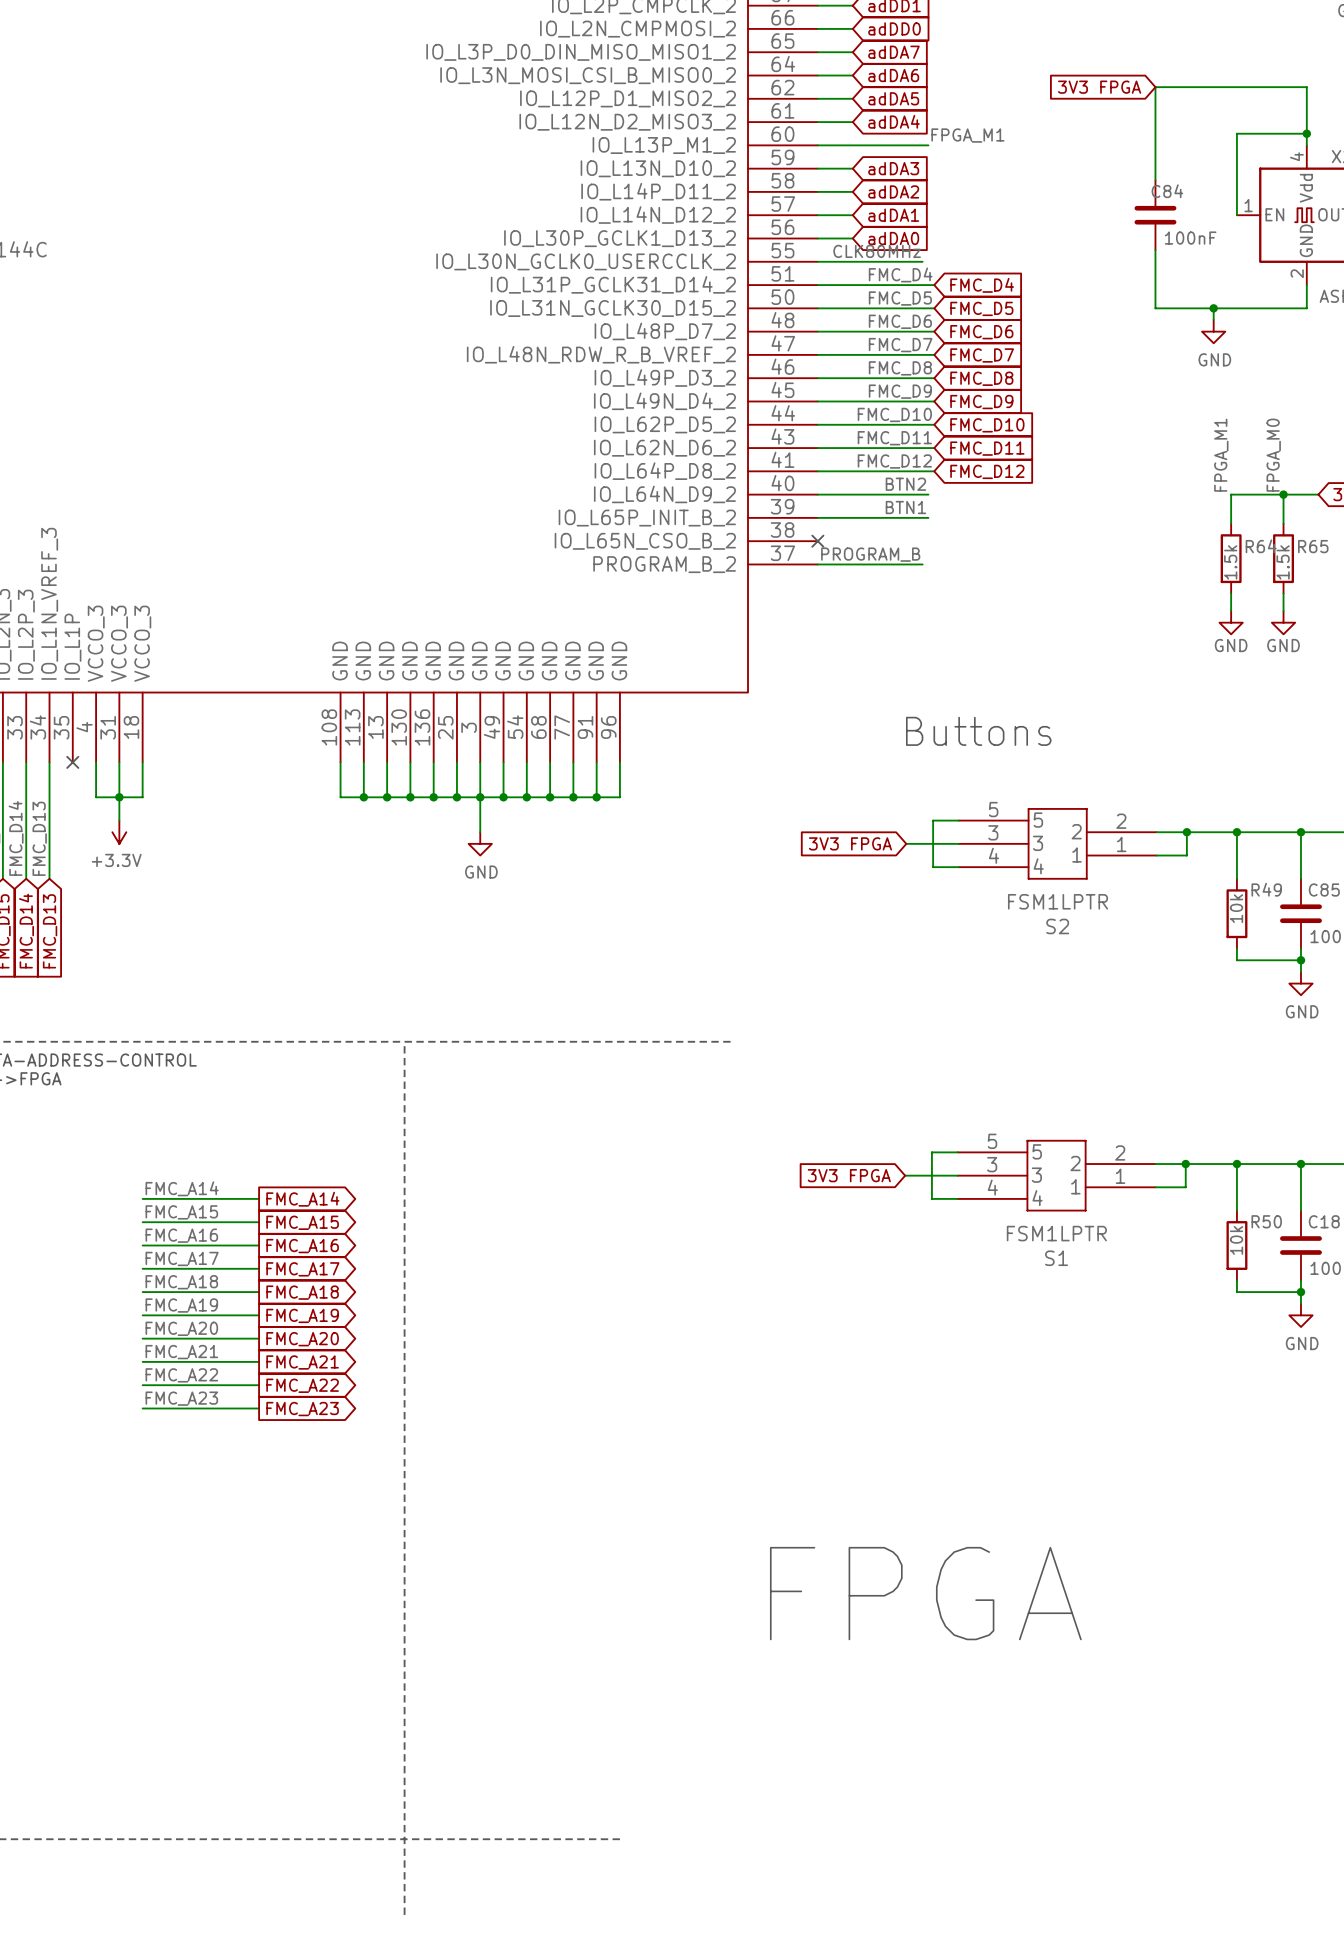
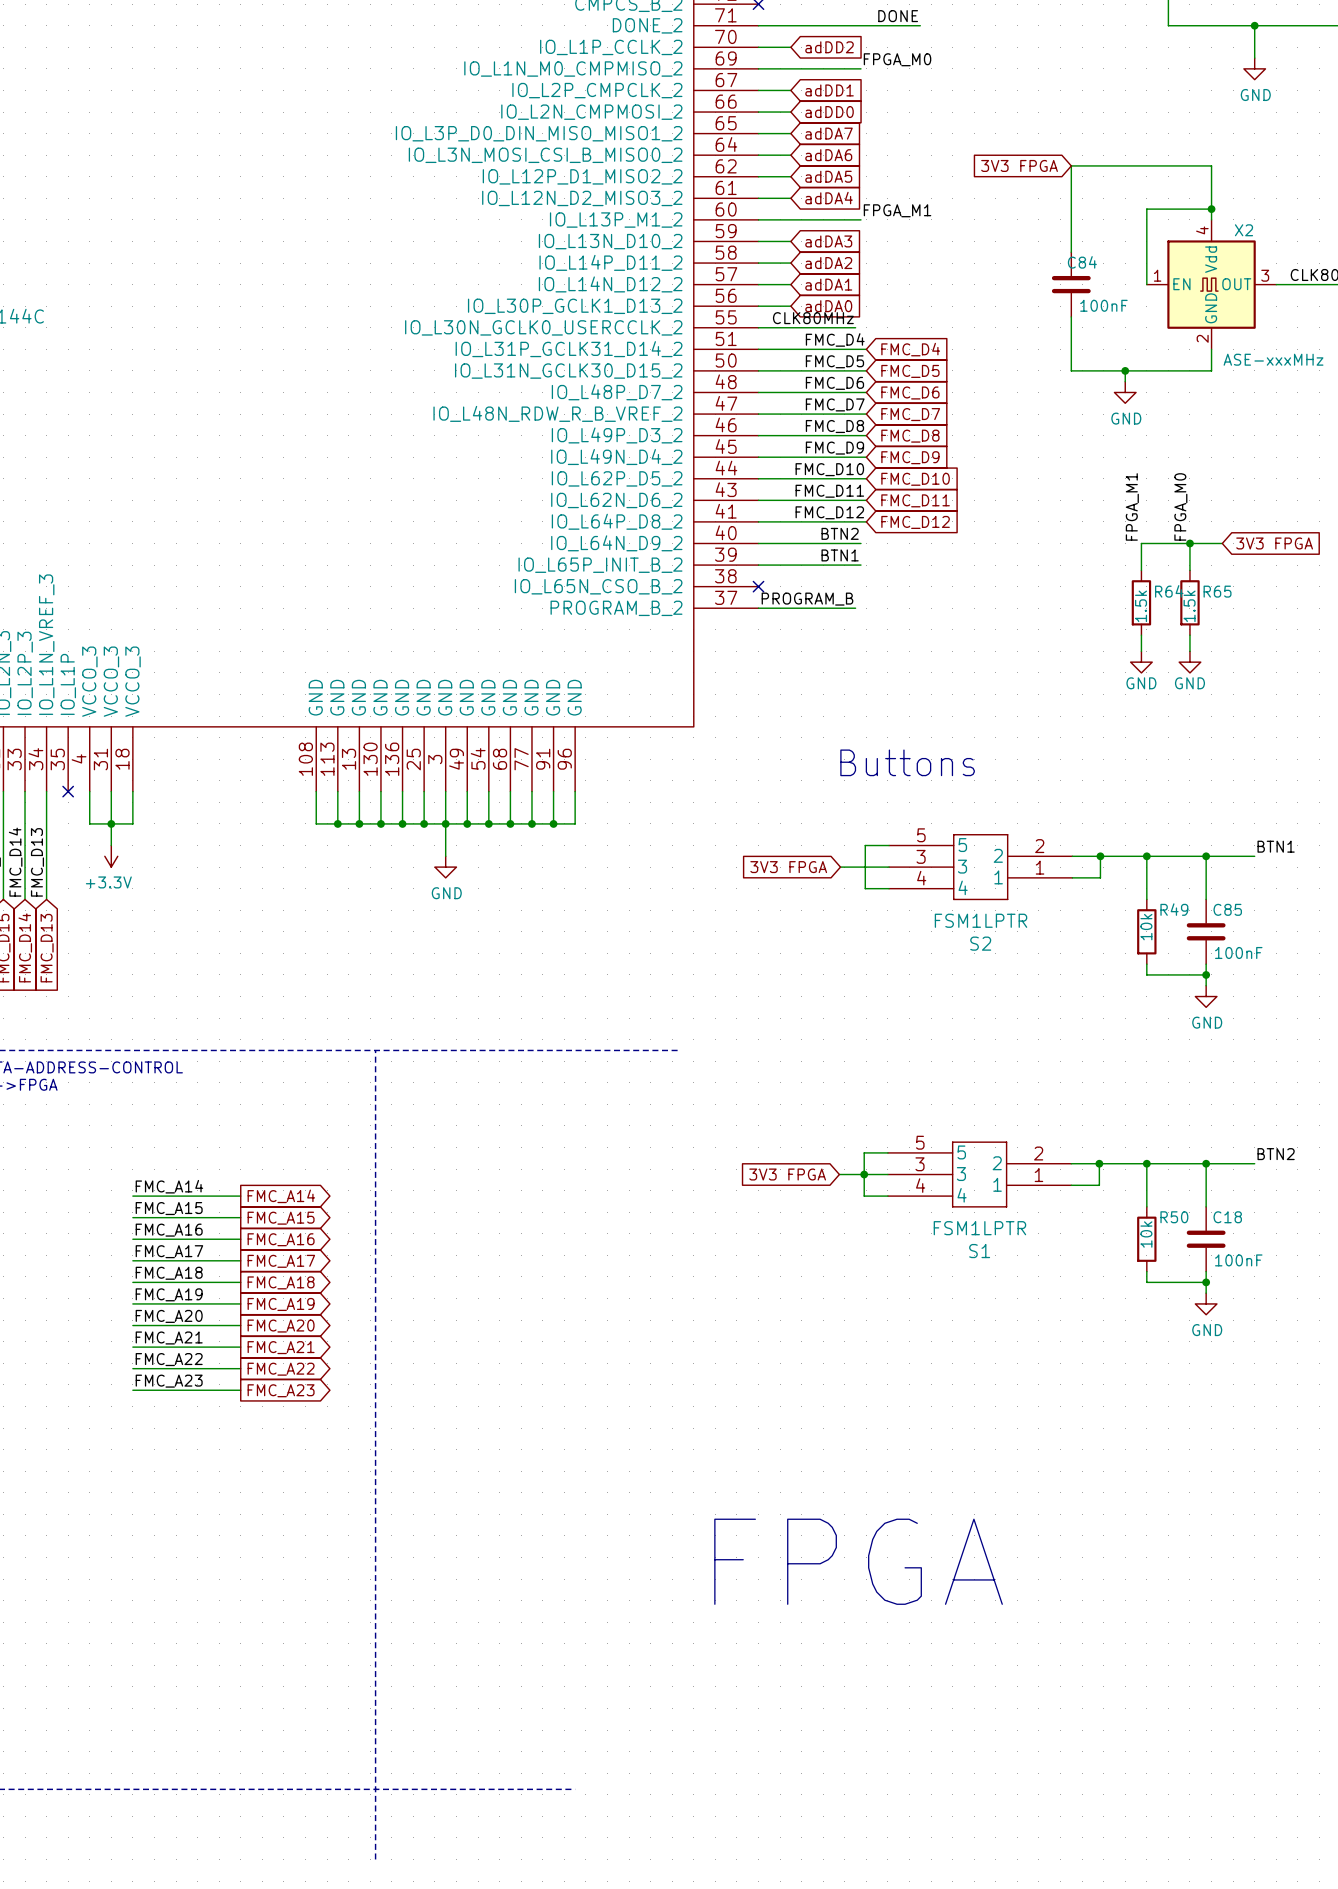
junction: none -> (864, 1174)

